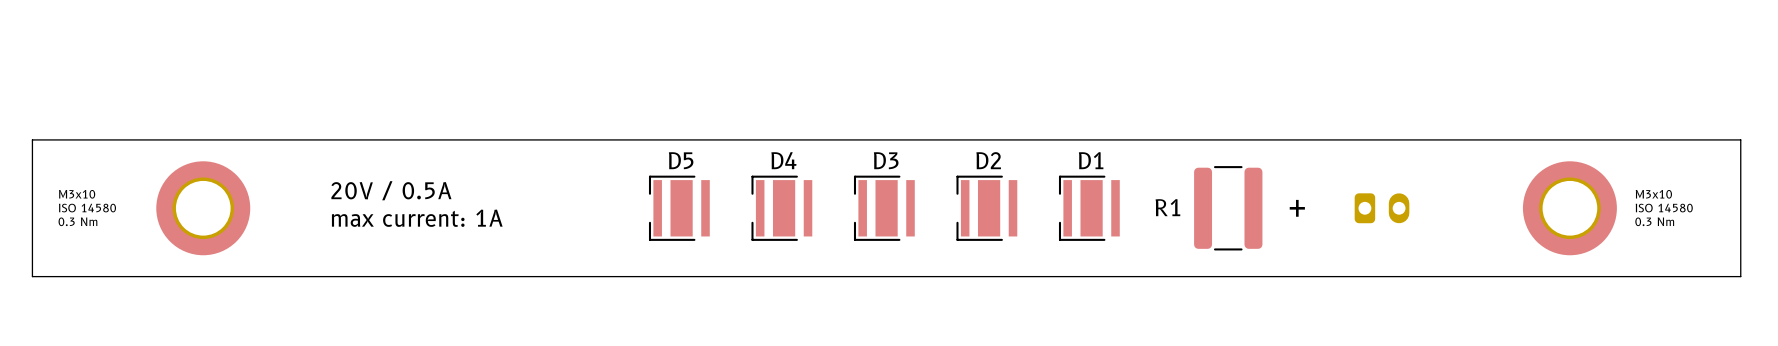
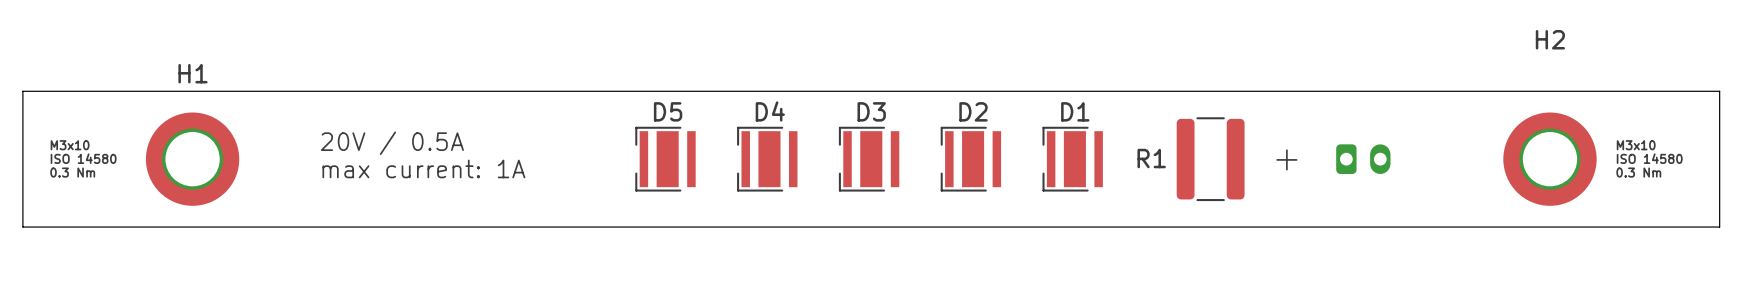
H2 name: none -> H2 (1550, 39)
H1 name: none -> H1 (192, 73)

